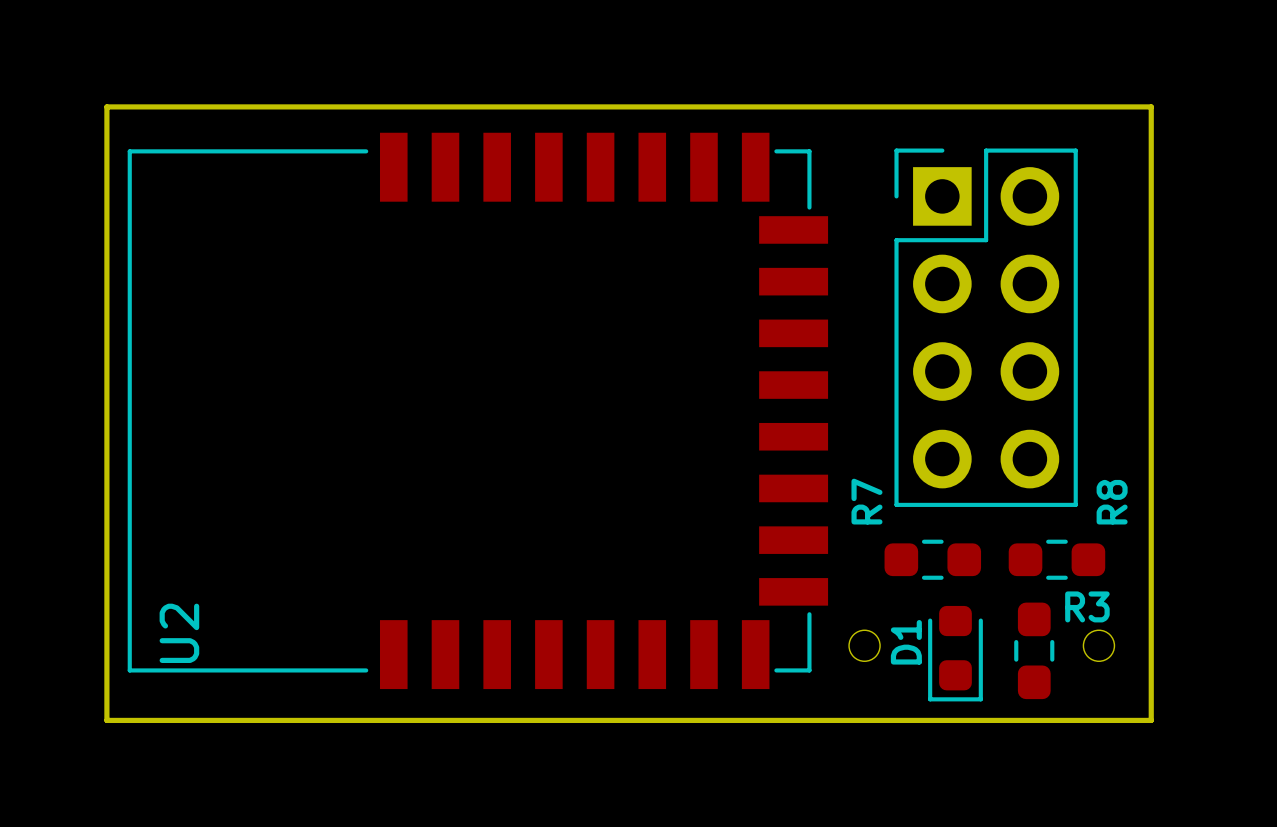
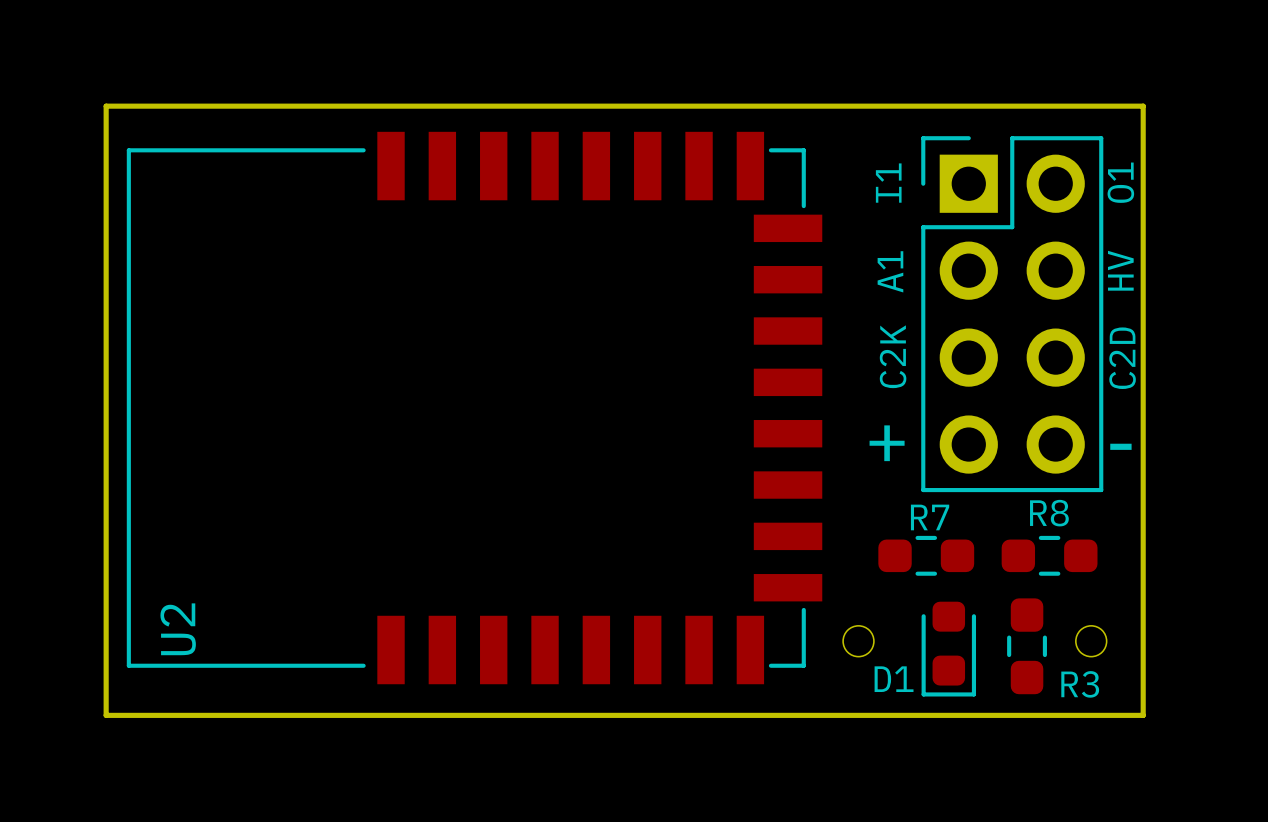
text: none -> I1 (888, 183)
text: none -> O1 (1120, 182)
text: none -> HV (1120, 270)
text: none -> A1 (890, 271)
part position: (986, 327) -> (1012, 314)
text: none -> C2K (893, 356)
text: none -> C2D (1122, 358)
text: none -> + (887, 443)
text: none -> - (1120, 446)
R7 name rotation: 0° (866, 501) -> 90° clockwise (930, 517)
R7 name position: R7 (866, 501) -> R7 (930, 517)
R8 name rotation: 0° (1112, 502) -> 90° clockwise (1049, 513)
R3 name position: R3 (1087, 606) -> R3 (1080, 684)
D1 name rotation: 0° (906, 642) -> 90° clockwise (894, 679)

